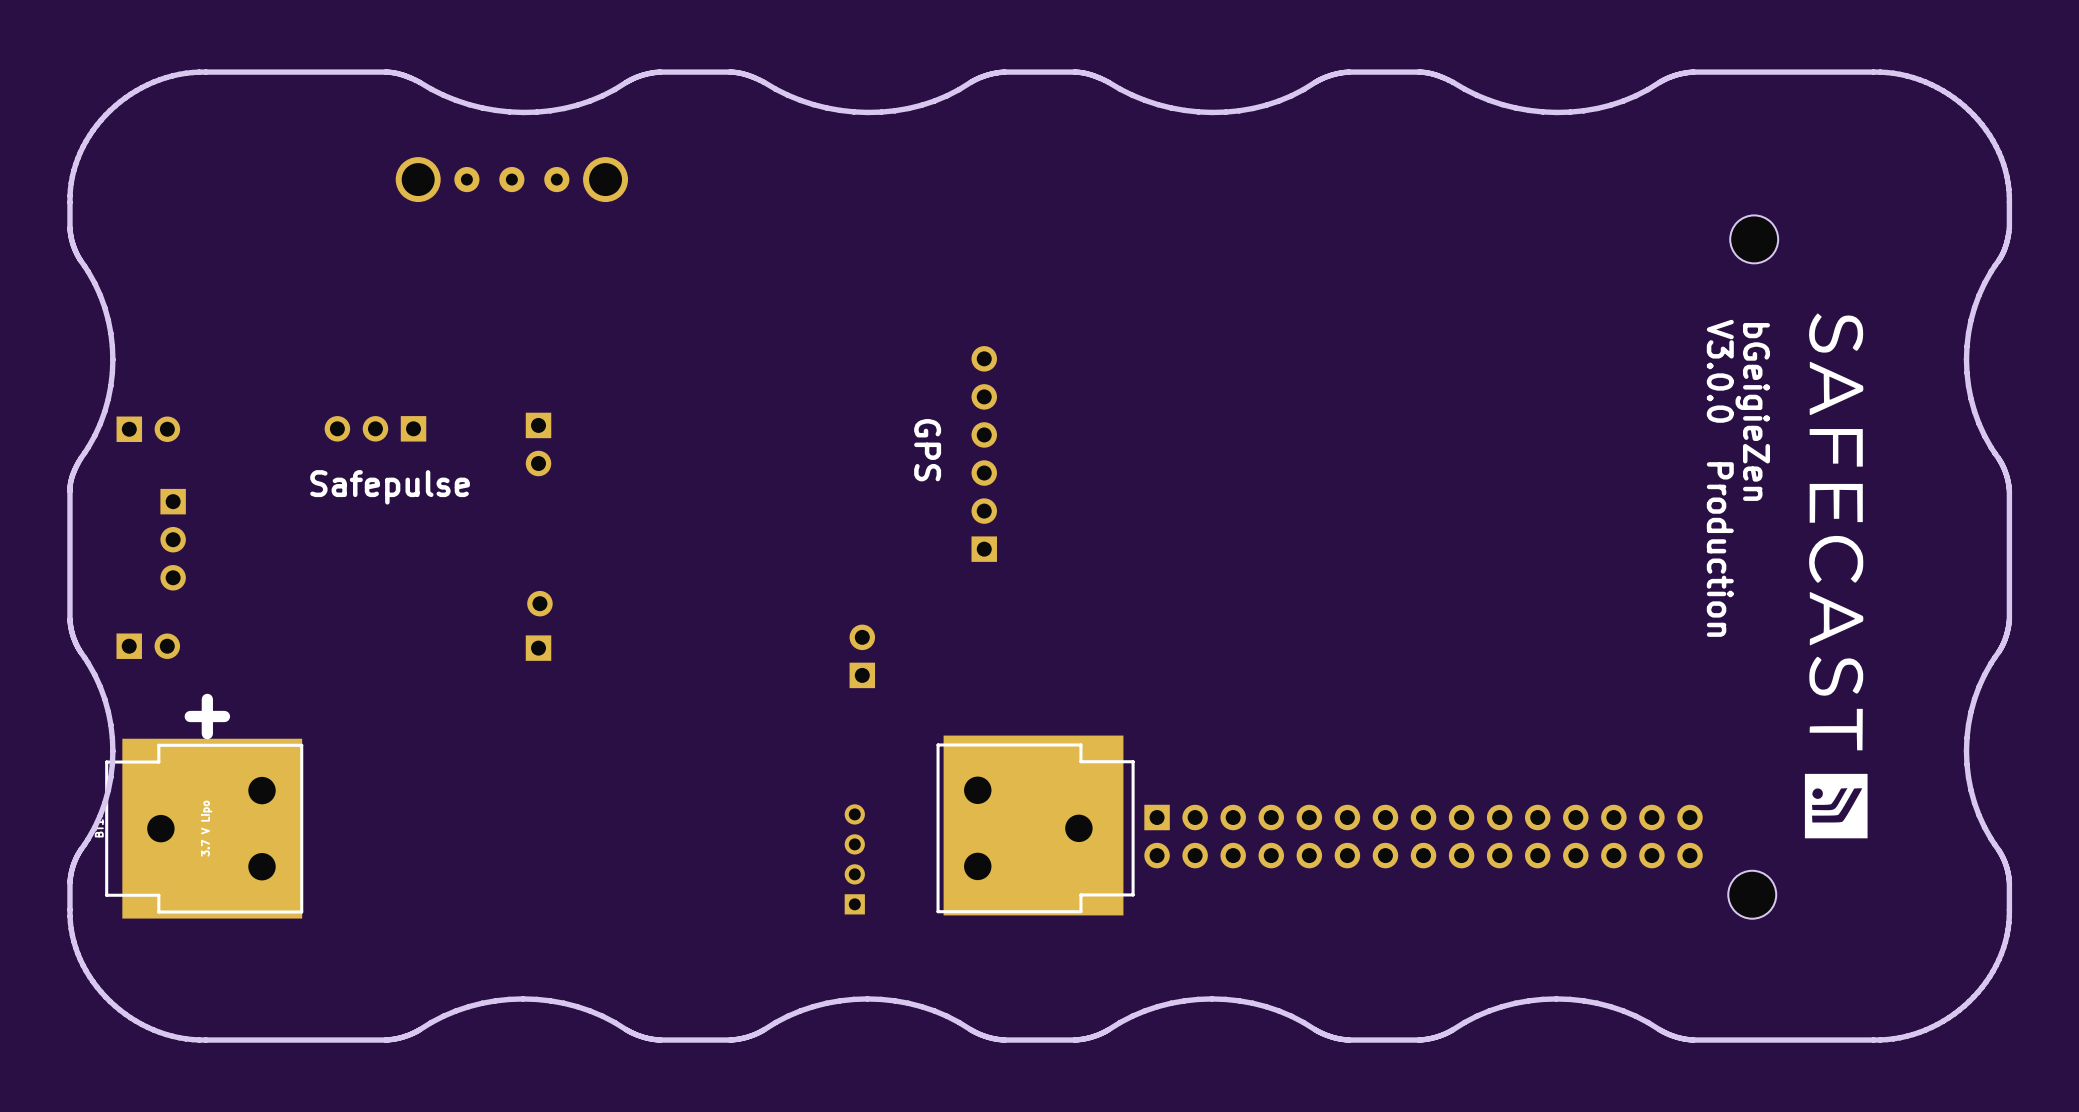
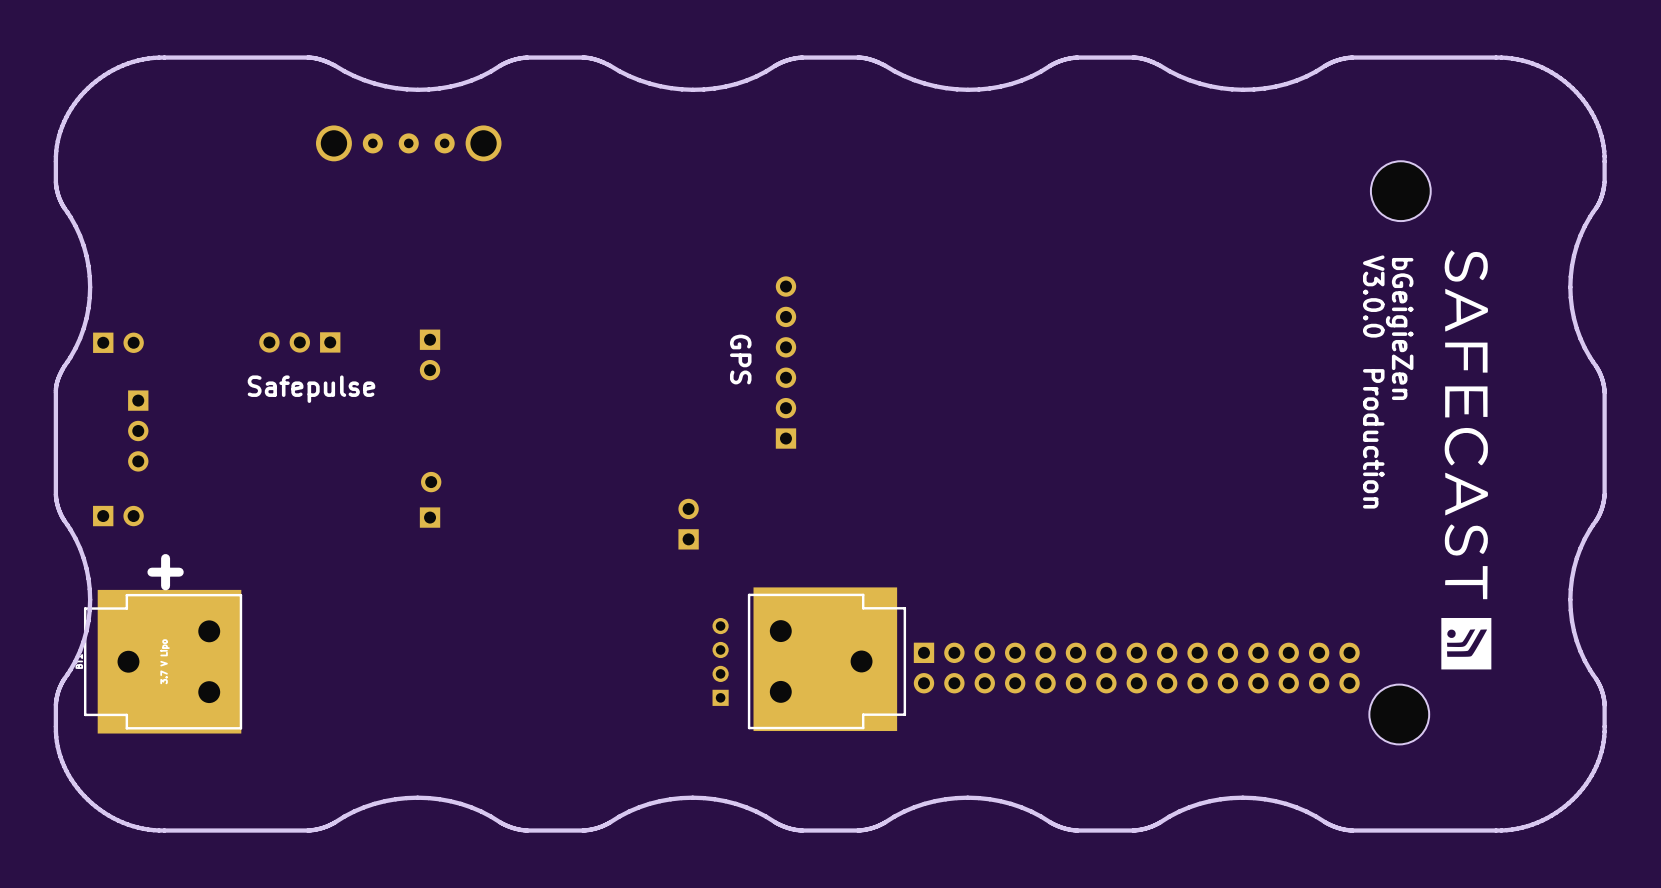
part footprint: [1730, 215, 1779, 264] -> [1370, 161, 1431, 222]
part position: (854, 859) -> (720, 661)
part footprint: [1728, 870, 1777, 919] -> [1369, 684, 1430, 745]

